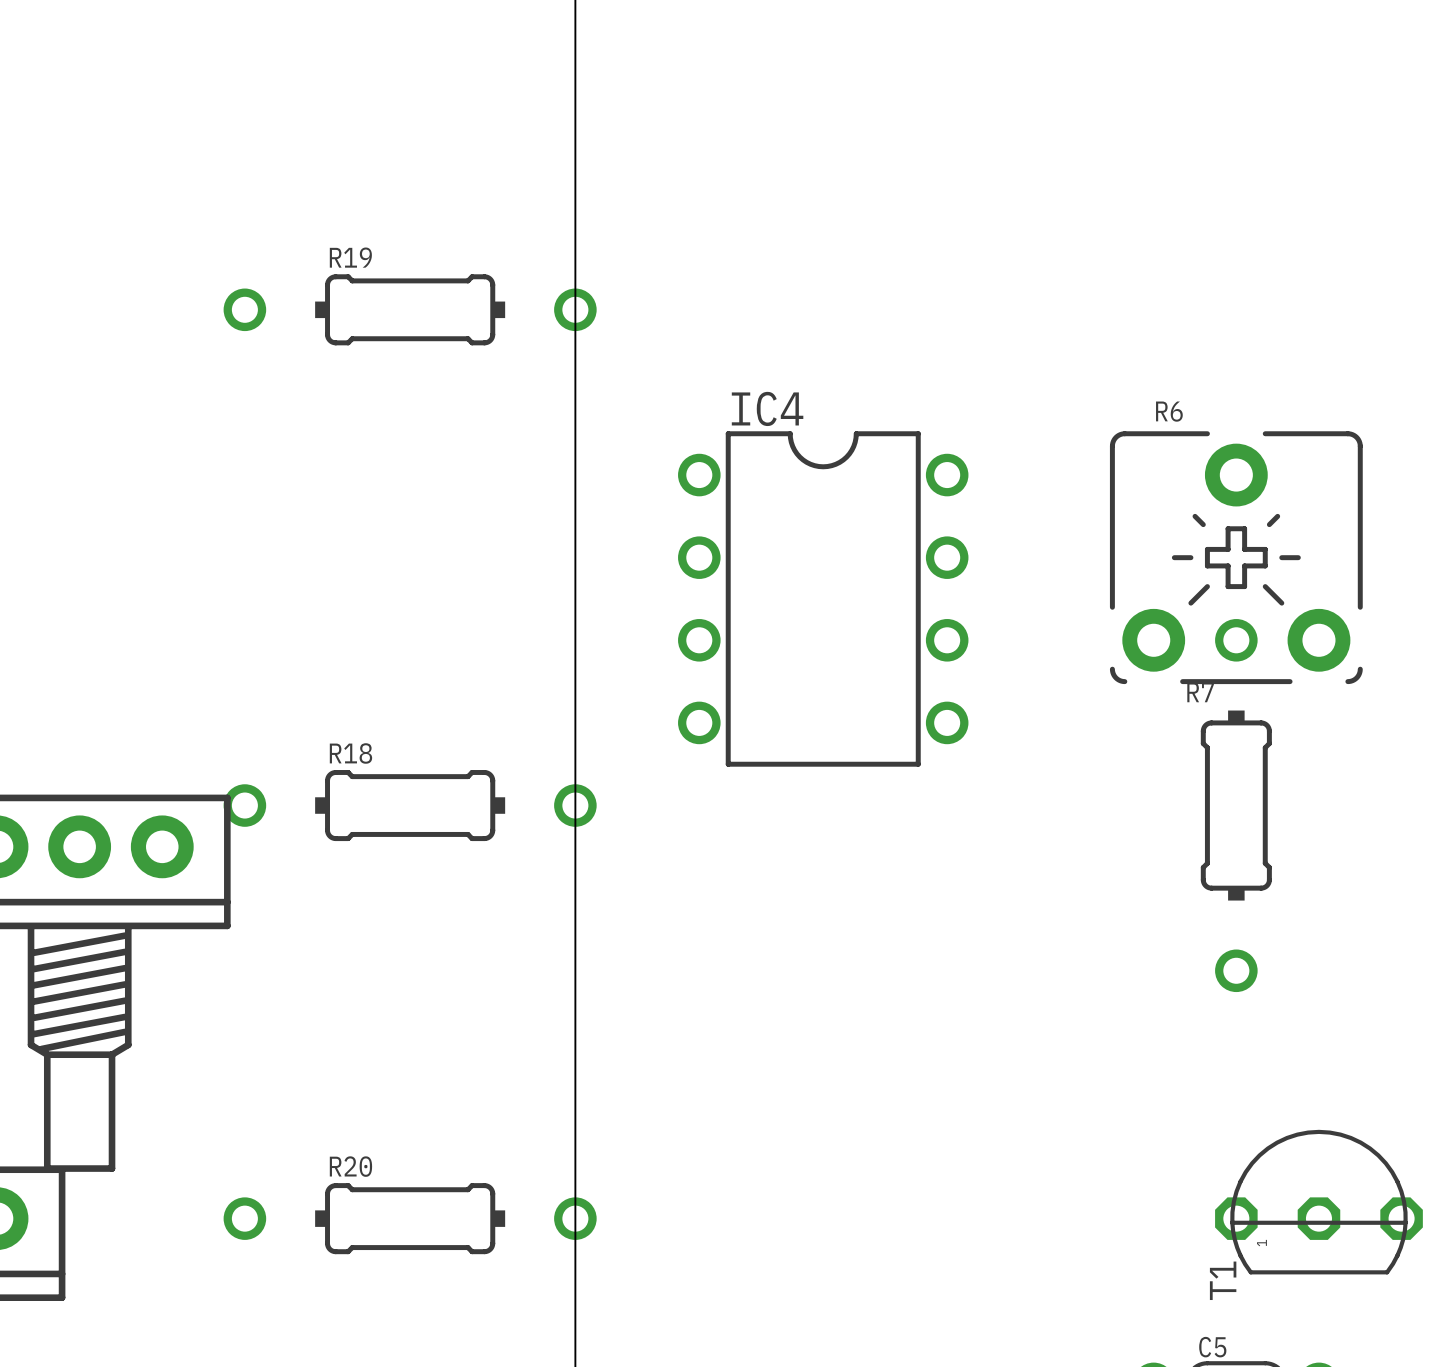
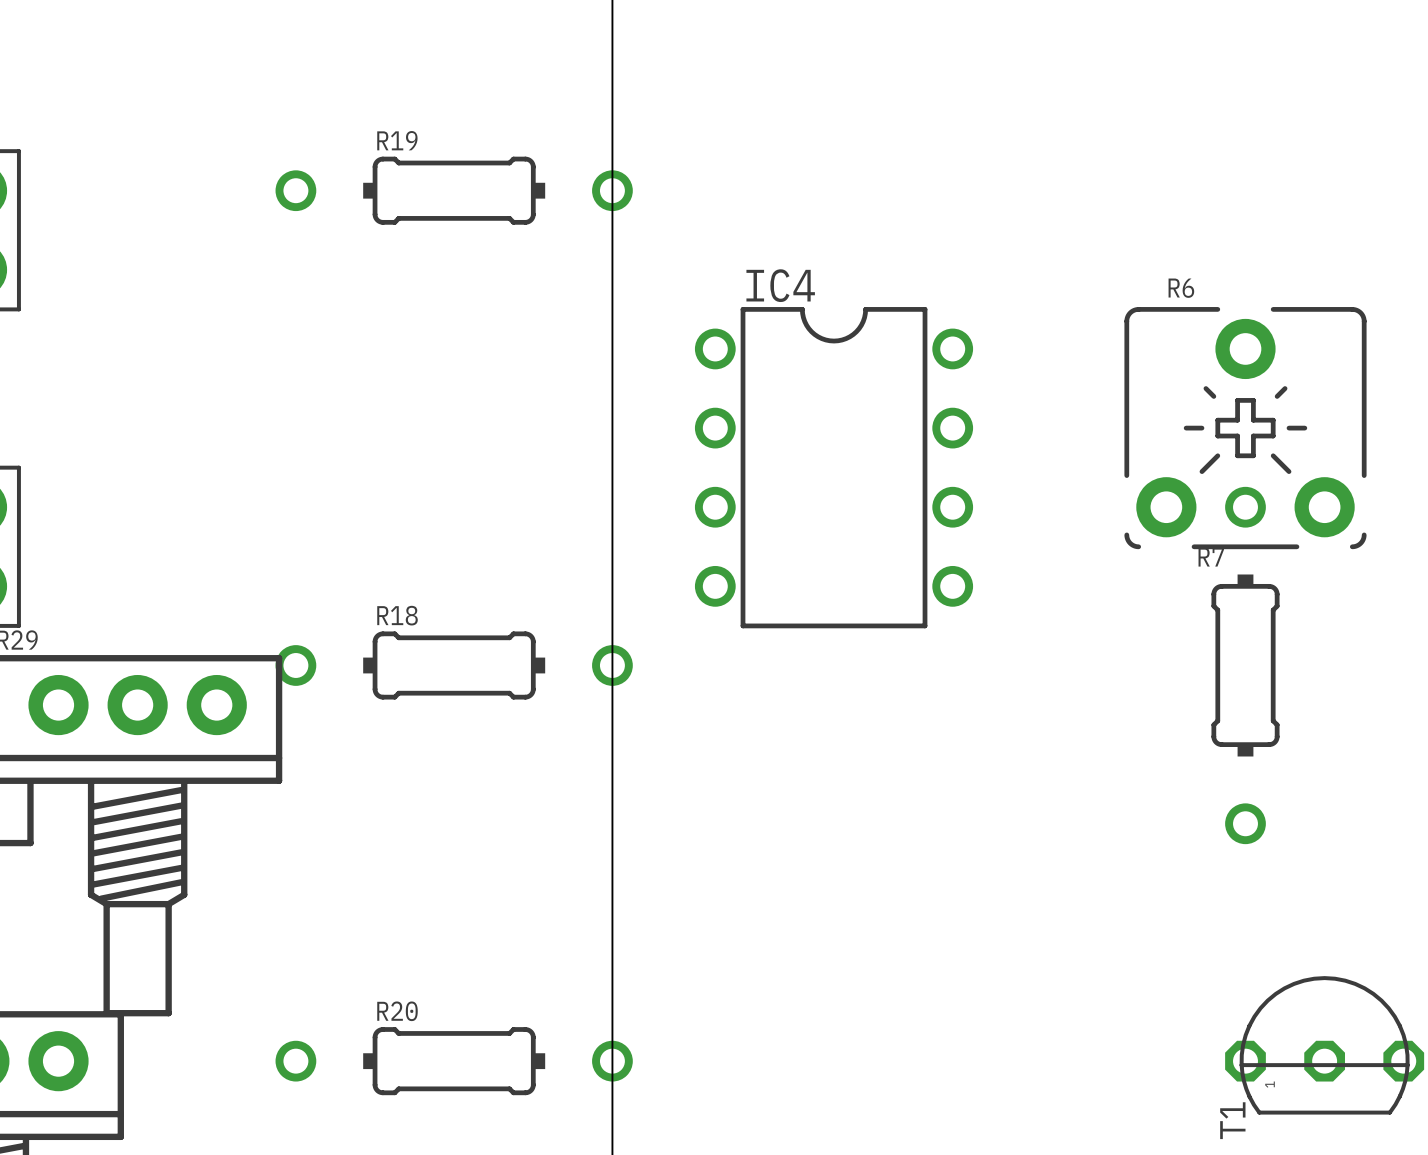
IC4 position: (823, 598) -> (834, 467)

